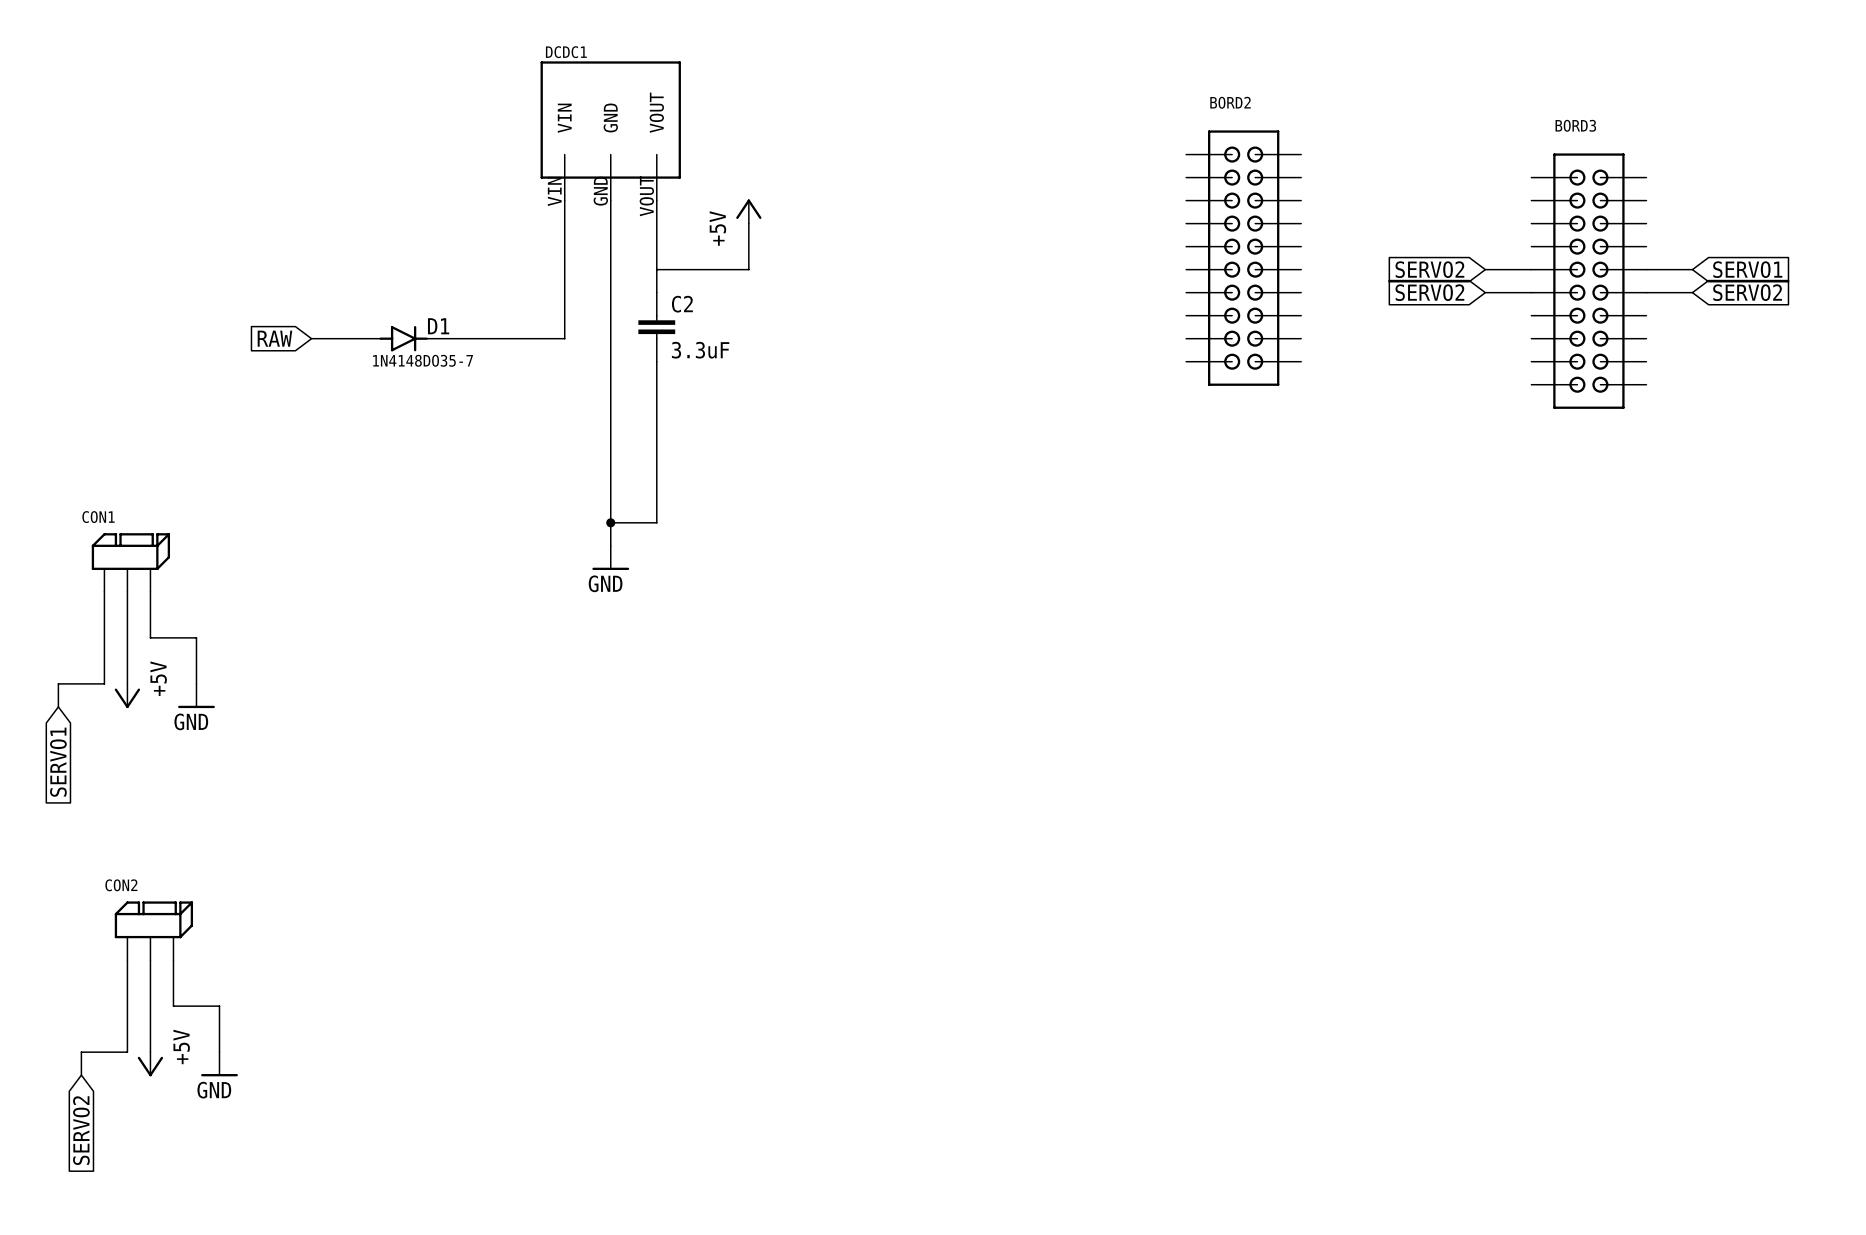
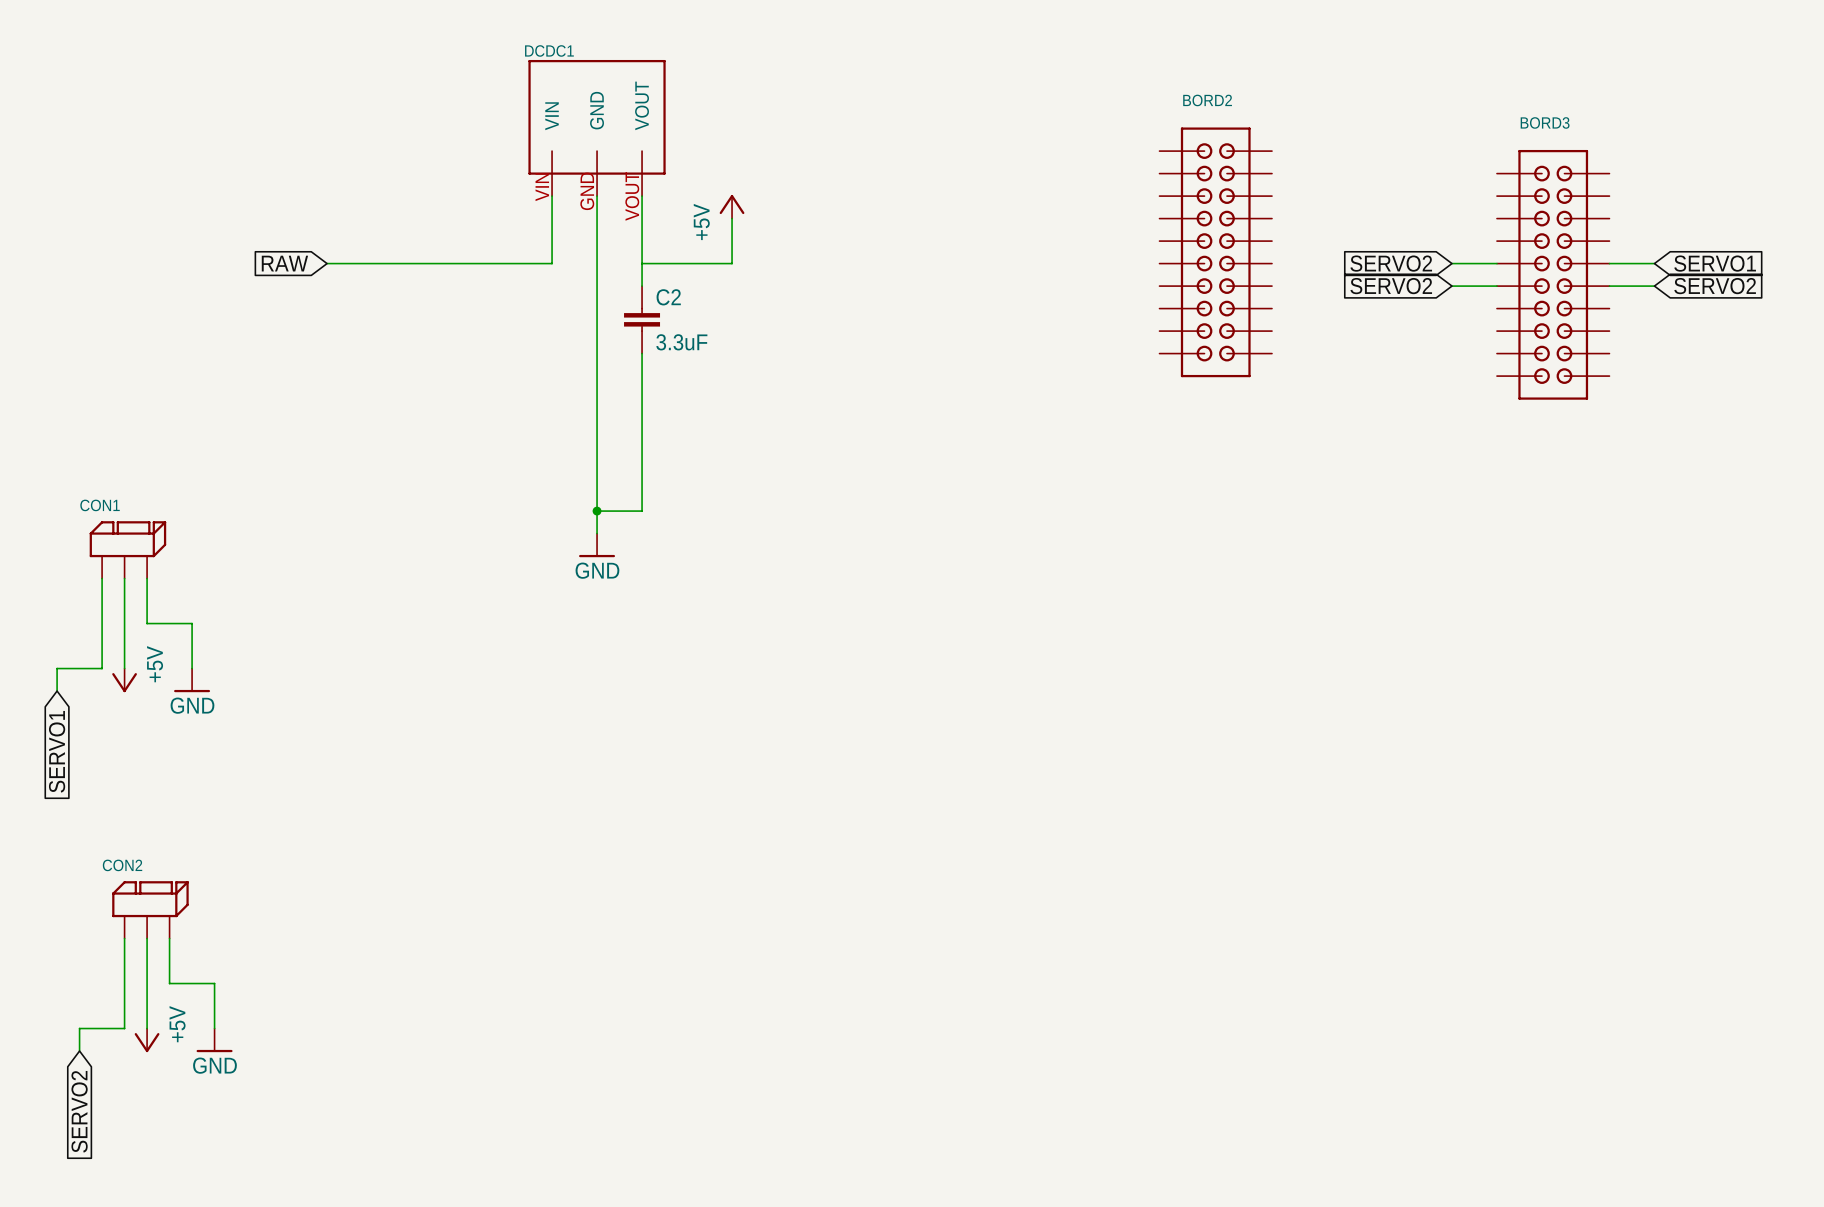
wire: (564, 269) (564, 338) (426, 338) -> (552, 263) (327, 263)
global label position: RAW (274, 338) -> RAW (284, 263)
wire: (311, 338) (380, 338) -> none
D1: 1N4148DO35-7 (403, 338) -> none

